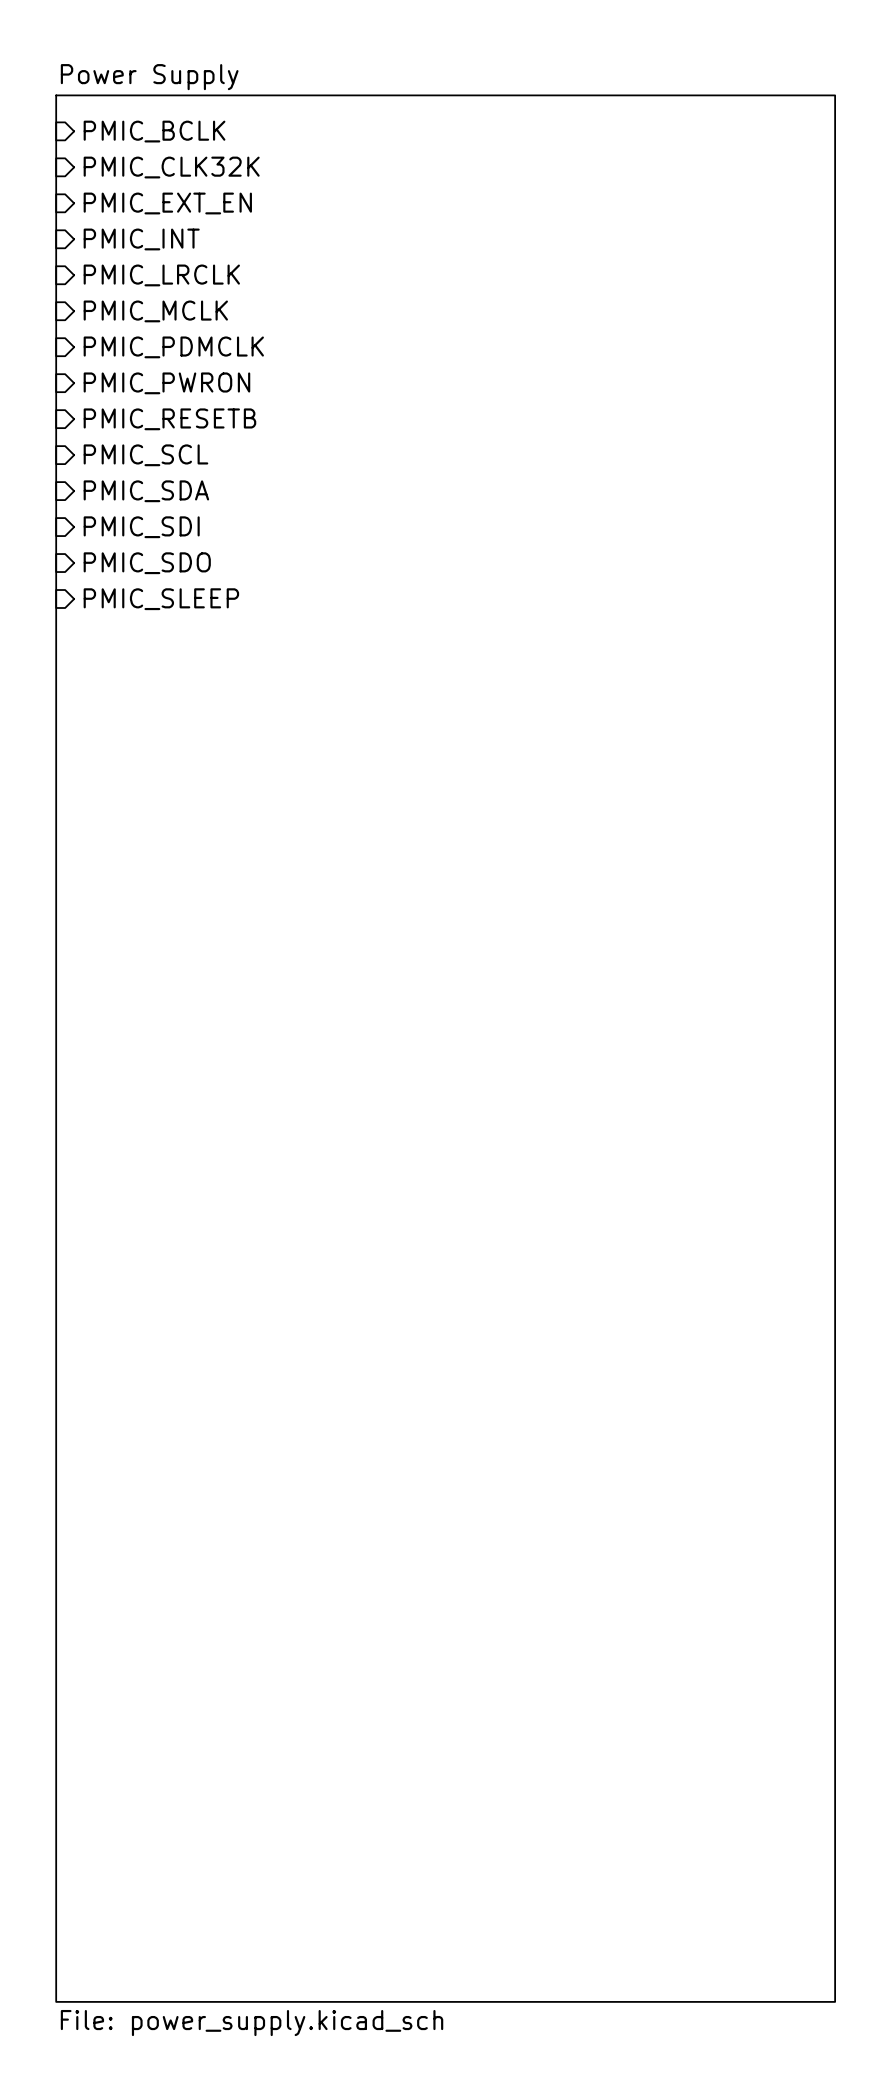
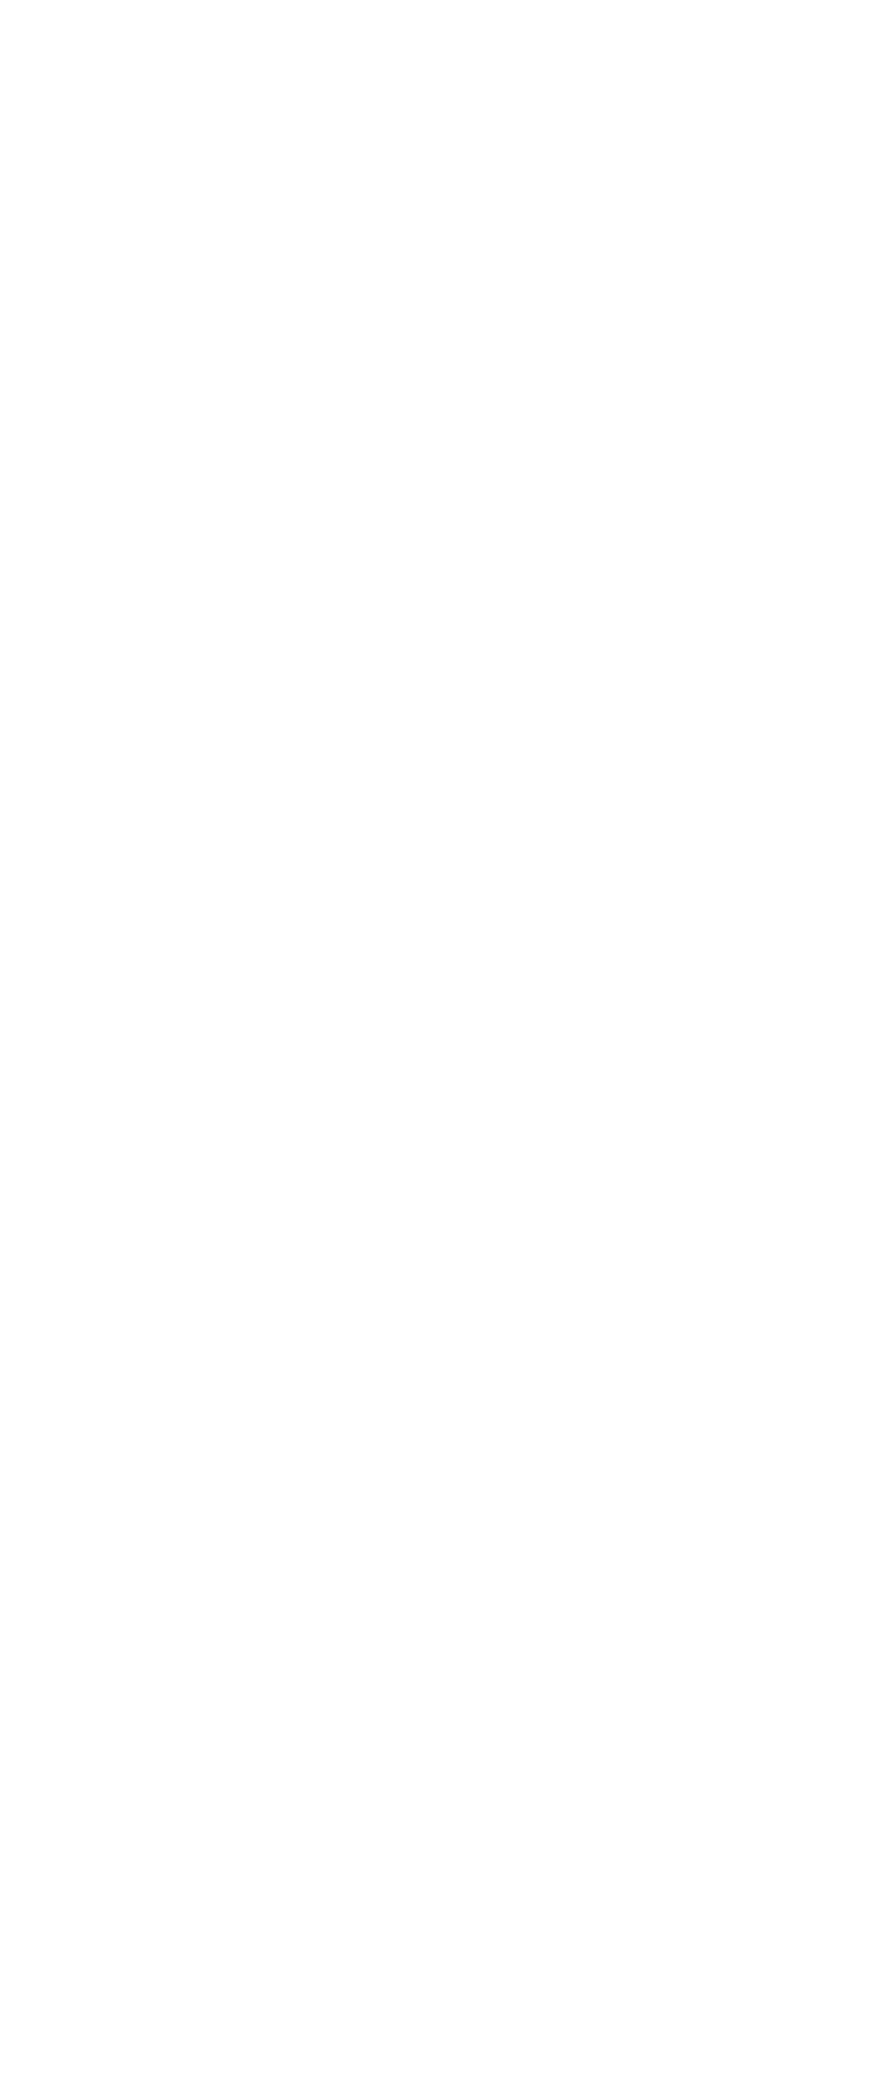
sheet pin: PMIC_BCLK (154, 131) -> none
sheet pin: PMIC_CLK32K (171, 167) -> none
sheet pin: PMIC_EXT_EN (167, 203) -> none
sheet pin: PMIC_INT (141, 239) -> none
sheet pin: PMIC_LRCLK (161, 275) -> none
sheet pin: PMIC_MCLK (155, 311) -> none
sheet pin: PMIC_PDMCLK (173, 347) -> none
sheet pin: PMIC_PWRON (166, 383) -> none
sheet pin: PMIC_RESETB (169, 419) -> none
sheet pin: PMIC_SCL (145, 455) -> none
sheet pin: PMIC_SDA (146, 491) -> none
sheet pin: PMIC_SDI (141, 527) -> none
sheet pin: PMIC_SDO (147, 563) -> none
sheet pin: PMIC_SLEEP (161, 599) -> none
sheet Power Supply: File: power_supply.kicad_sch (445, 1048) -> none

